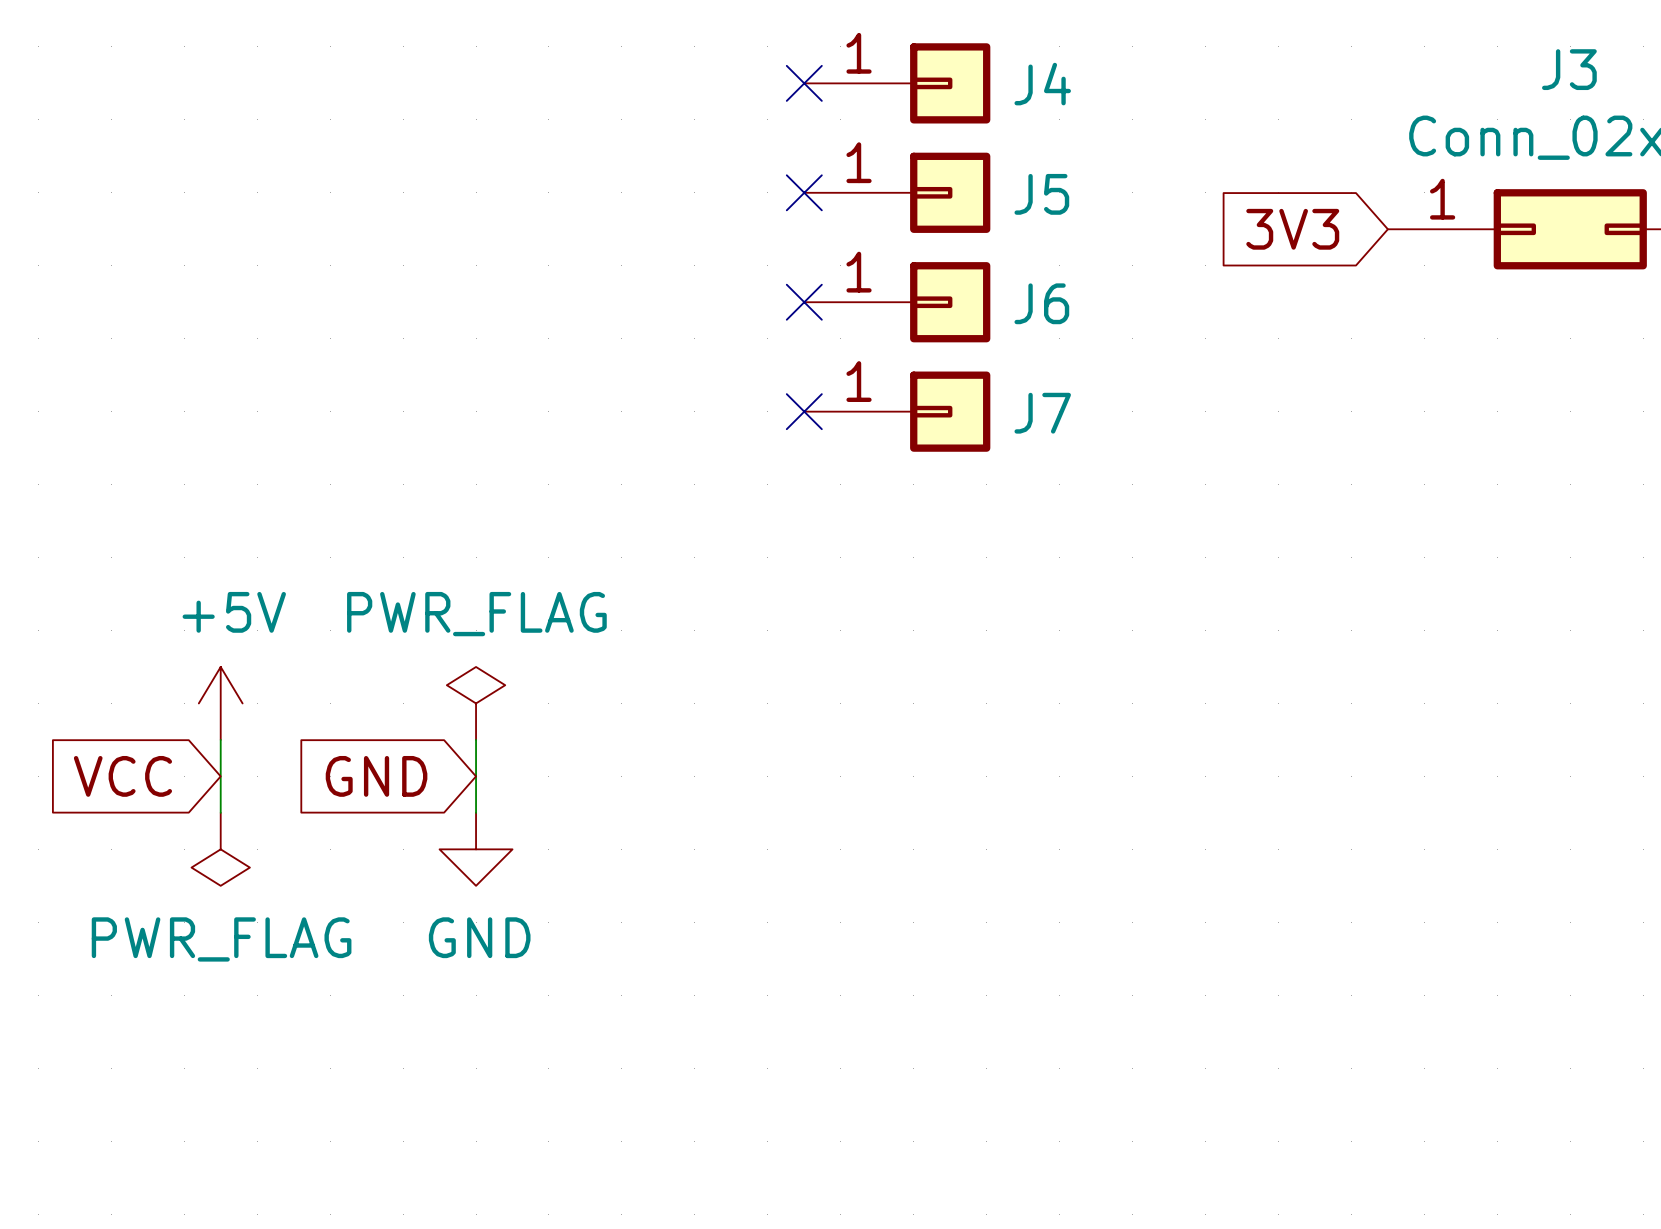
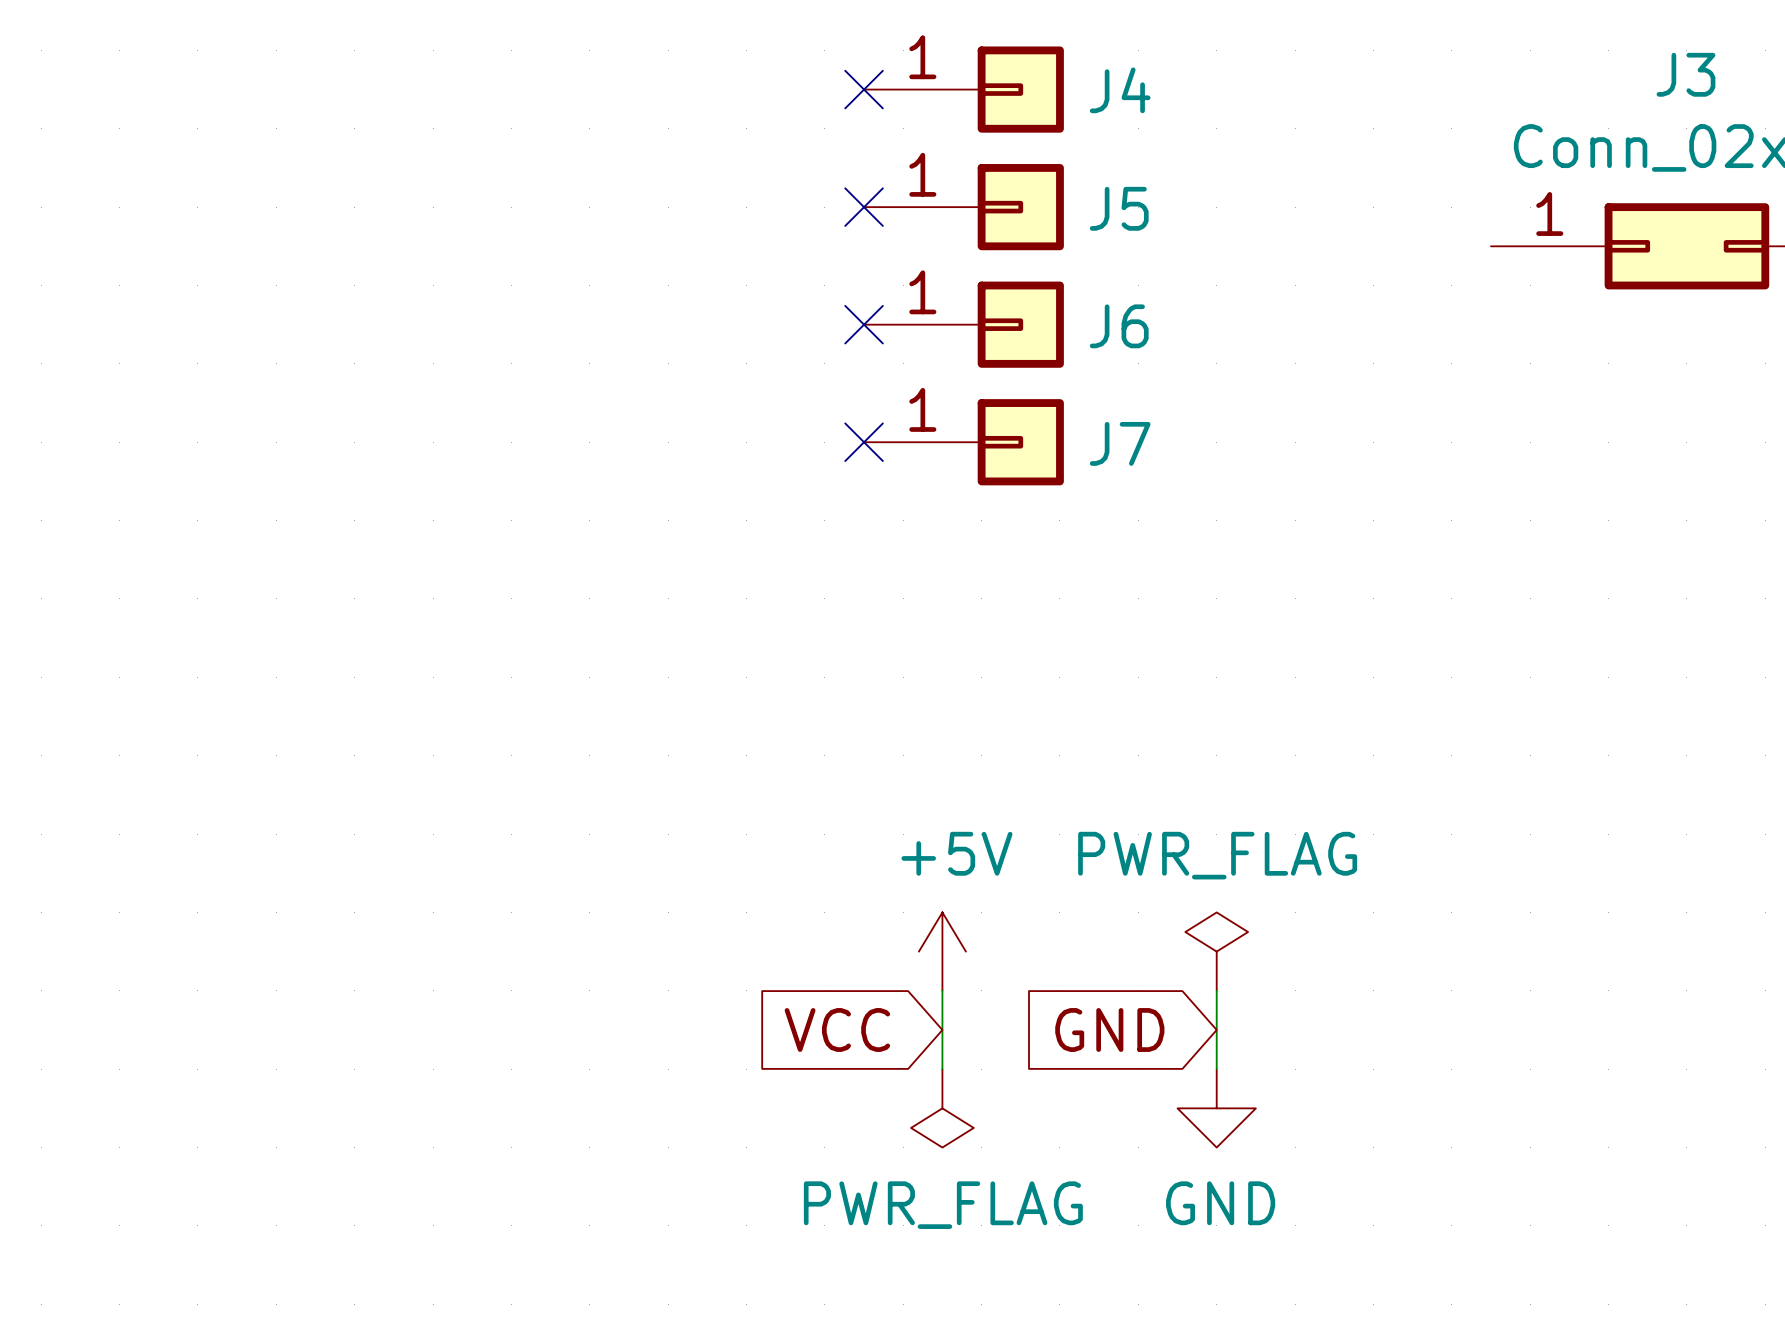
global label: 3V3 (1292, 229) -> none
power symbol position: +5V (220, 703) -> +5V (942, 951)
power symbol: PWR_FLAG (476, 703) -> none
wire: (220, 739) (220, 812) -> (942, 990) (942, 1069)
wire: (476, 739) (476, 812) -> (1216, 990) (1216, 1069)
global label position: VCC (122, 776) -> VCC (837, 1029)
global label: GND (376, 776) -> none
power symbol: PWR_FLAG (220, 849) -> none
power symbol position: GND (476, 849) -> GND (1216, 1108)
power symbol: none -> PWR_FLAG (1216, 951)
global label: none -> GND (1109, 1029)
power symbol: none -> PWR_FLAG (942, 1108)

